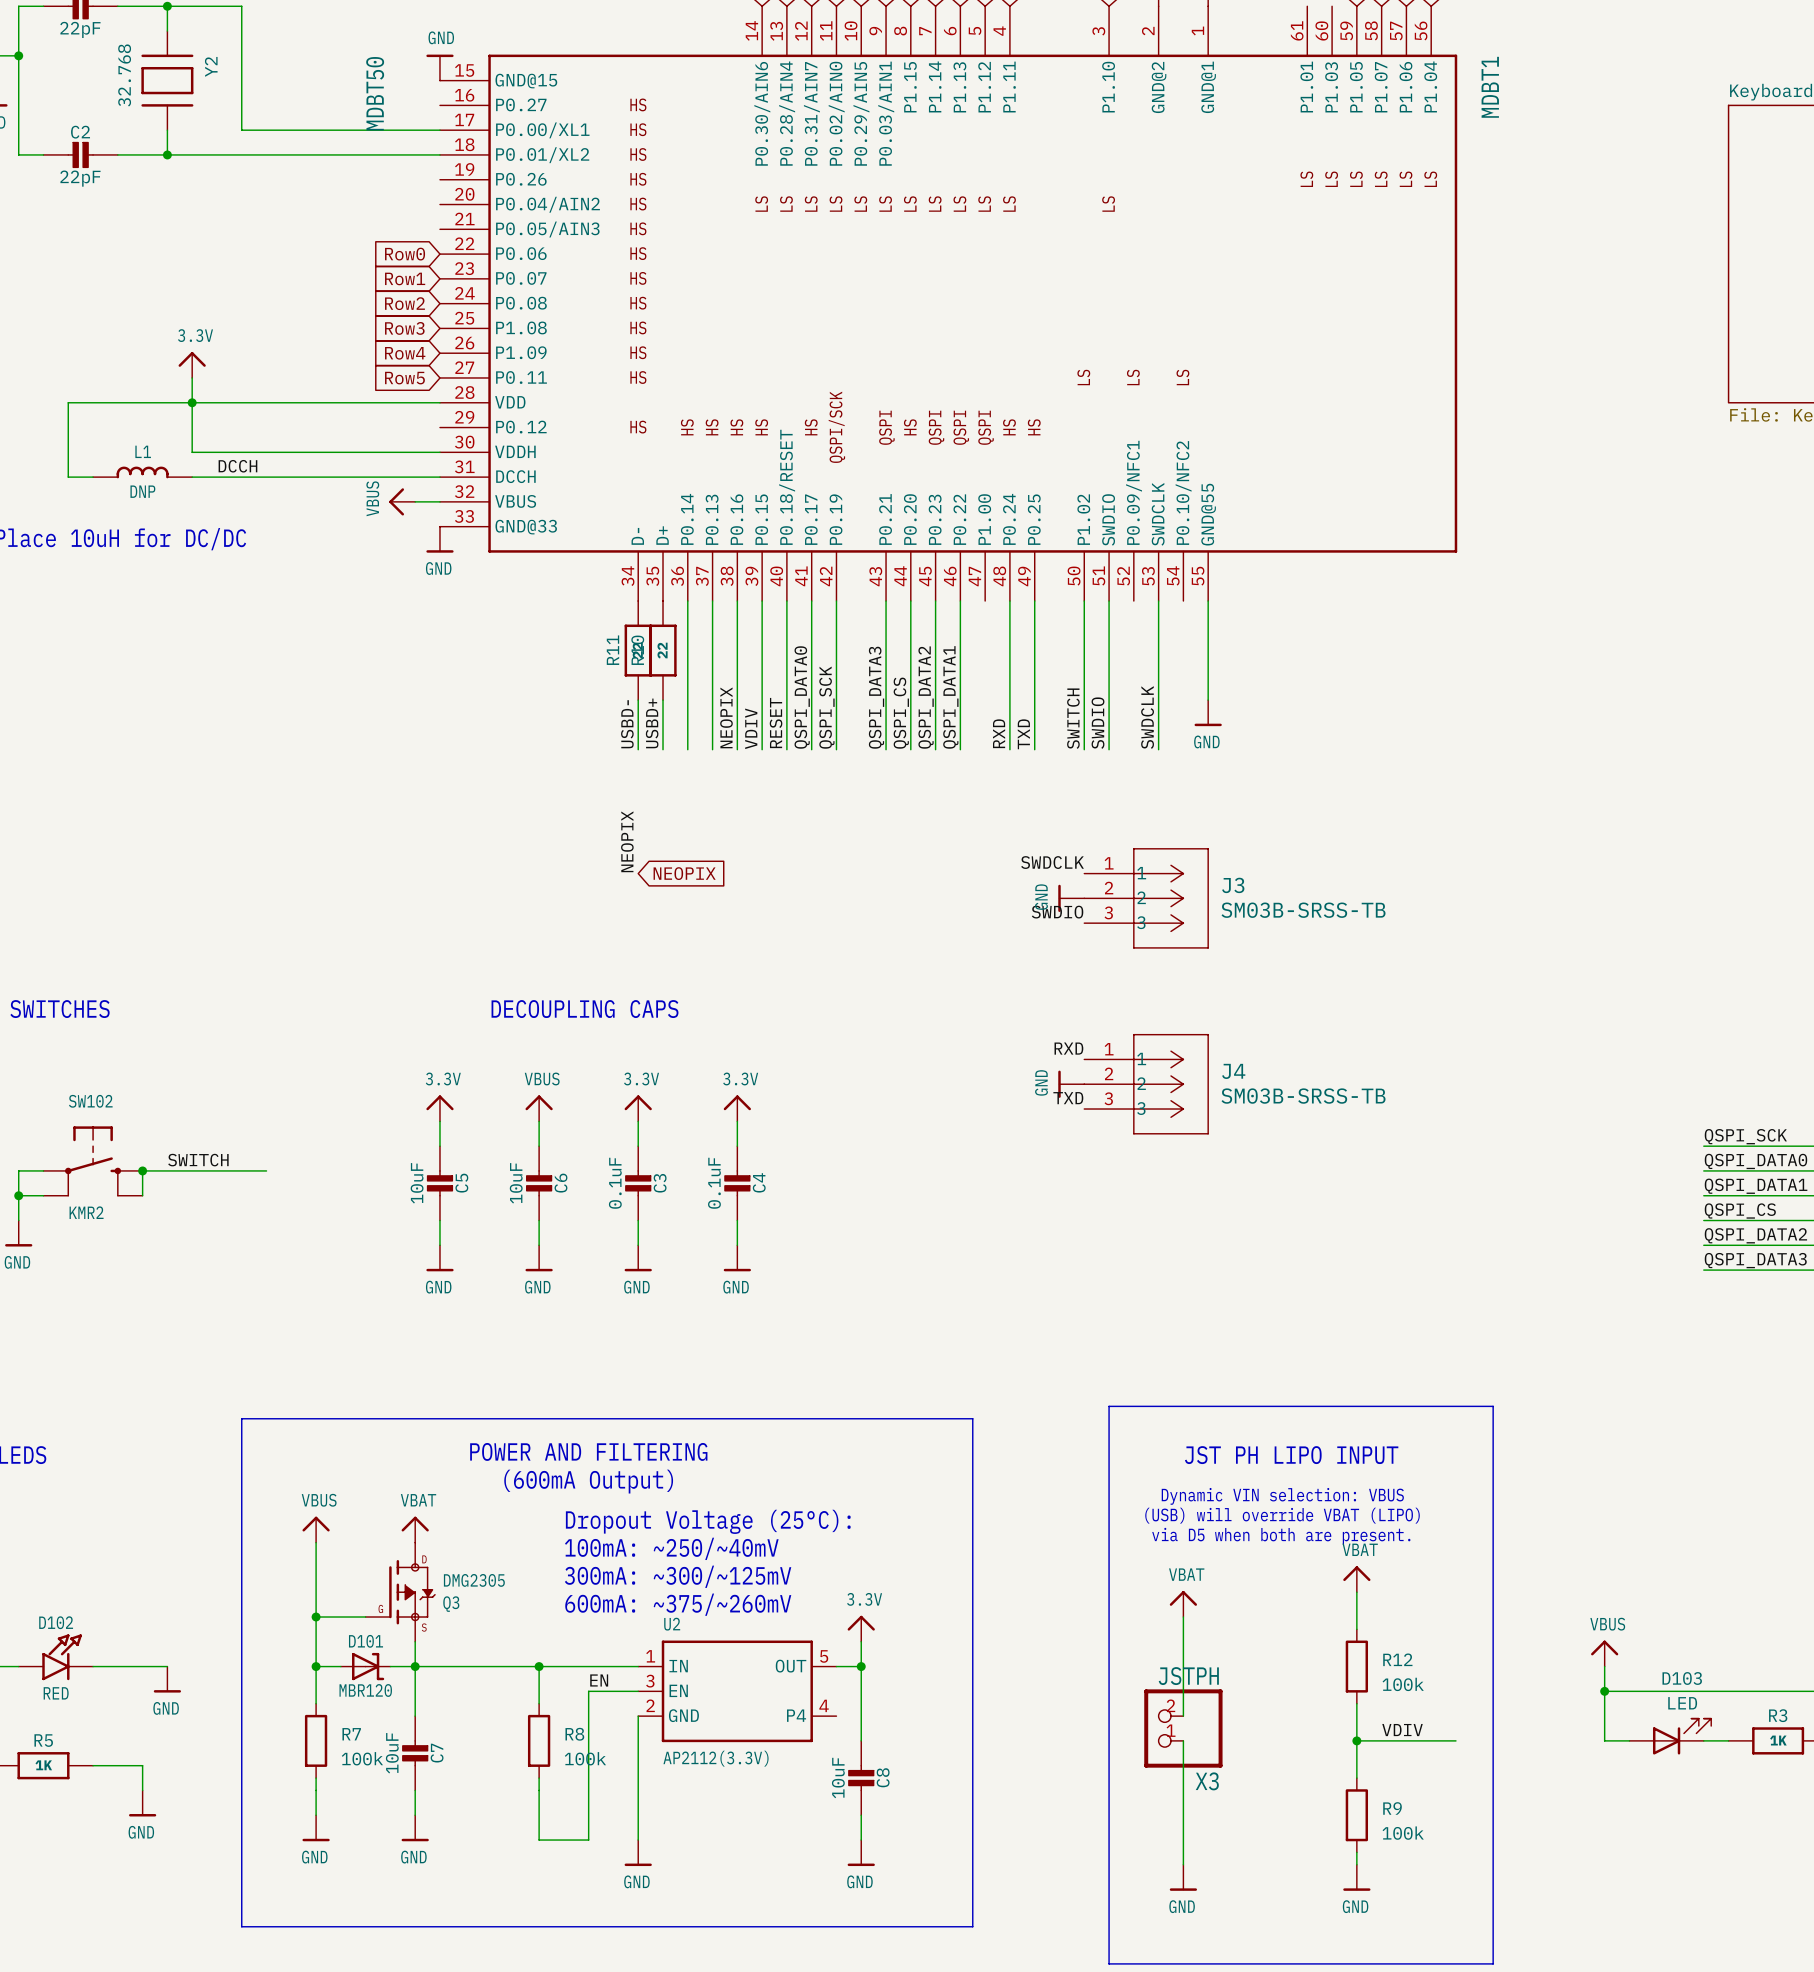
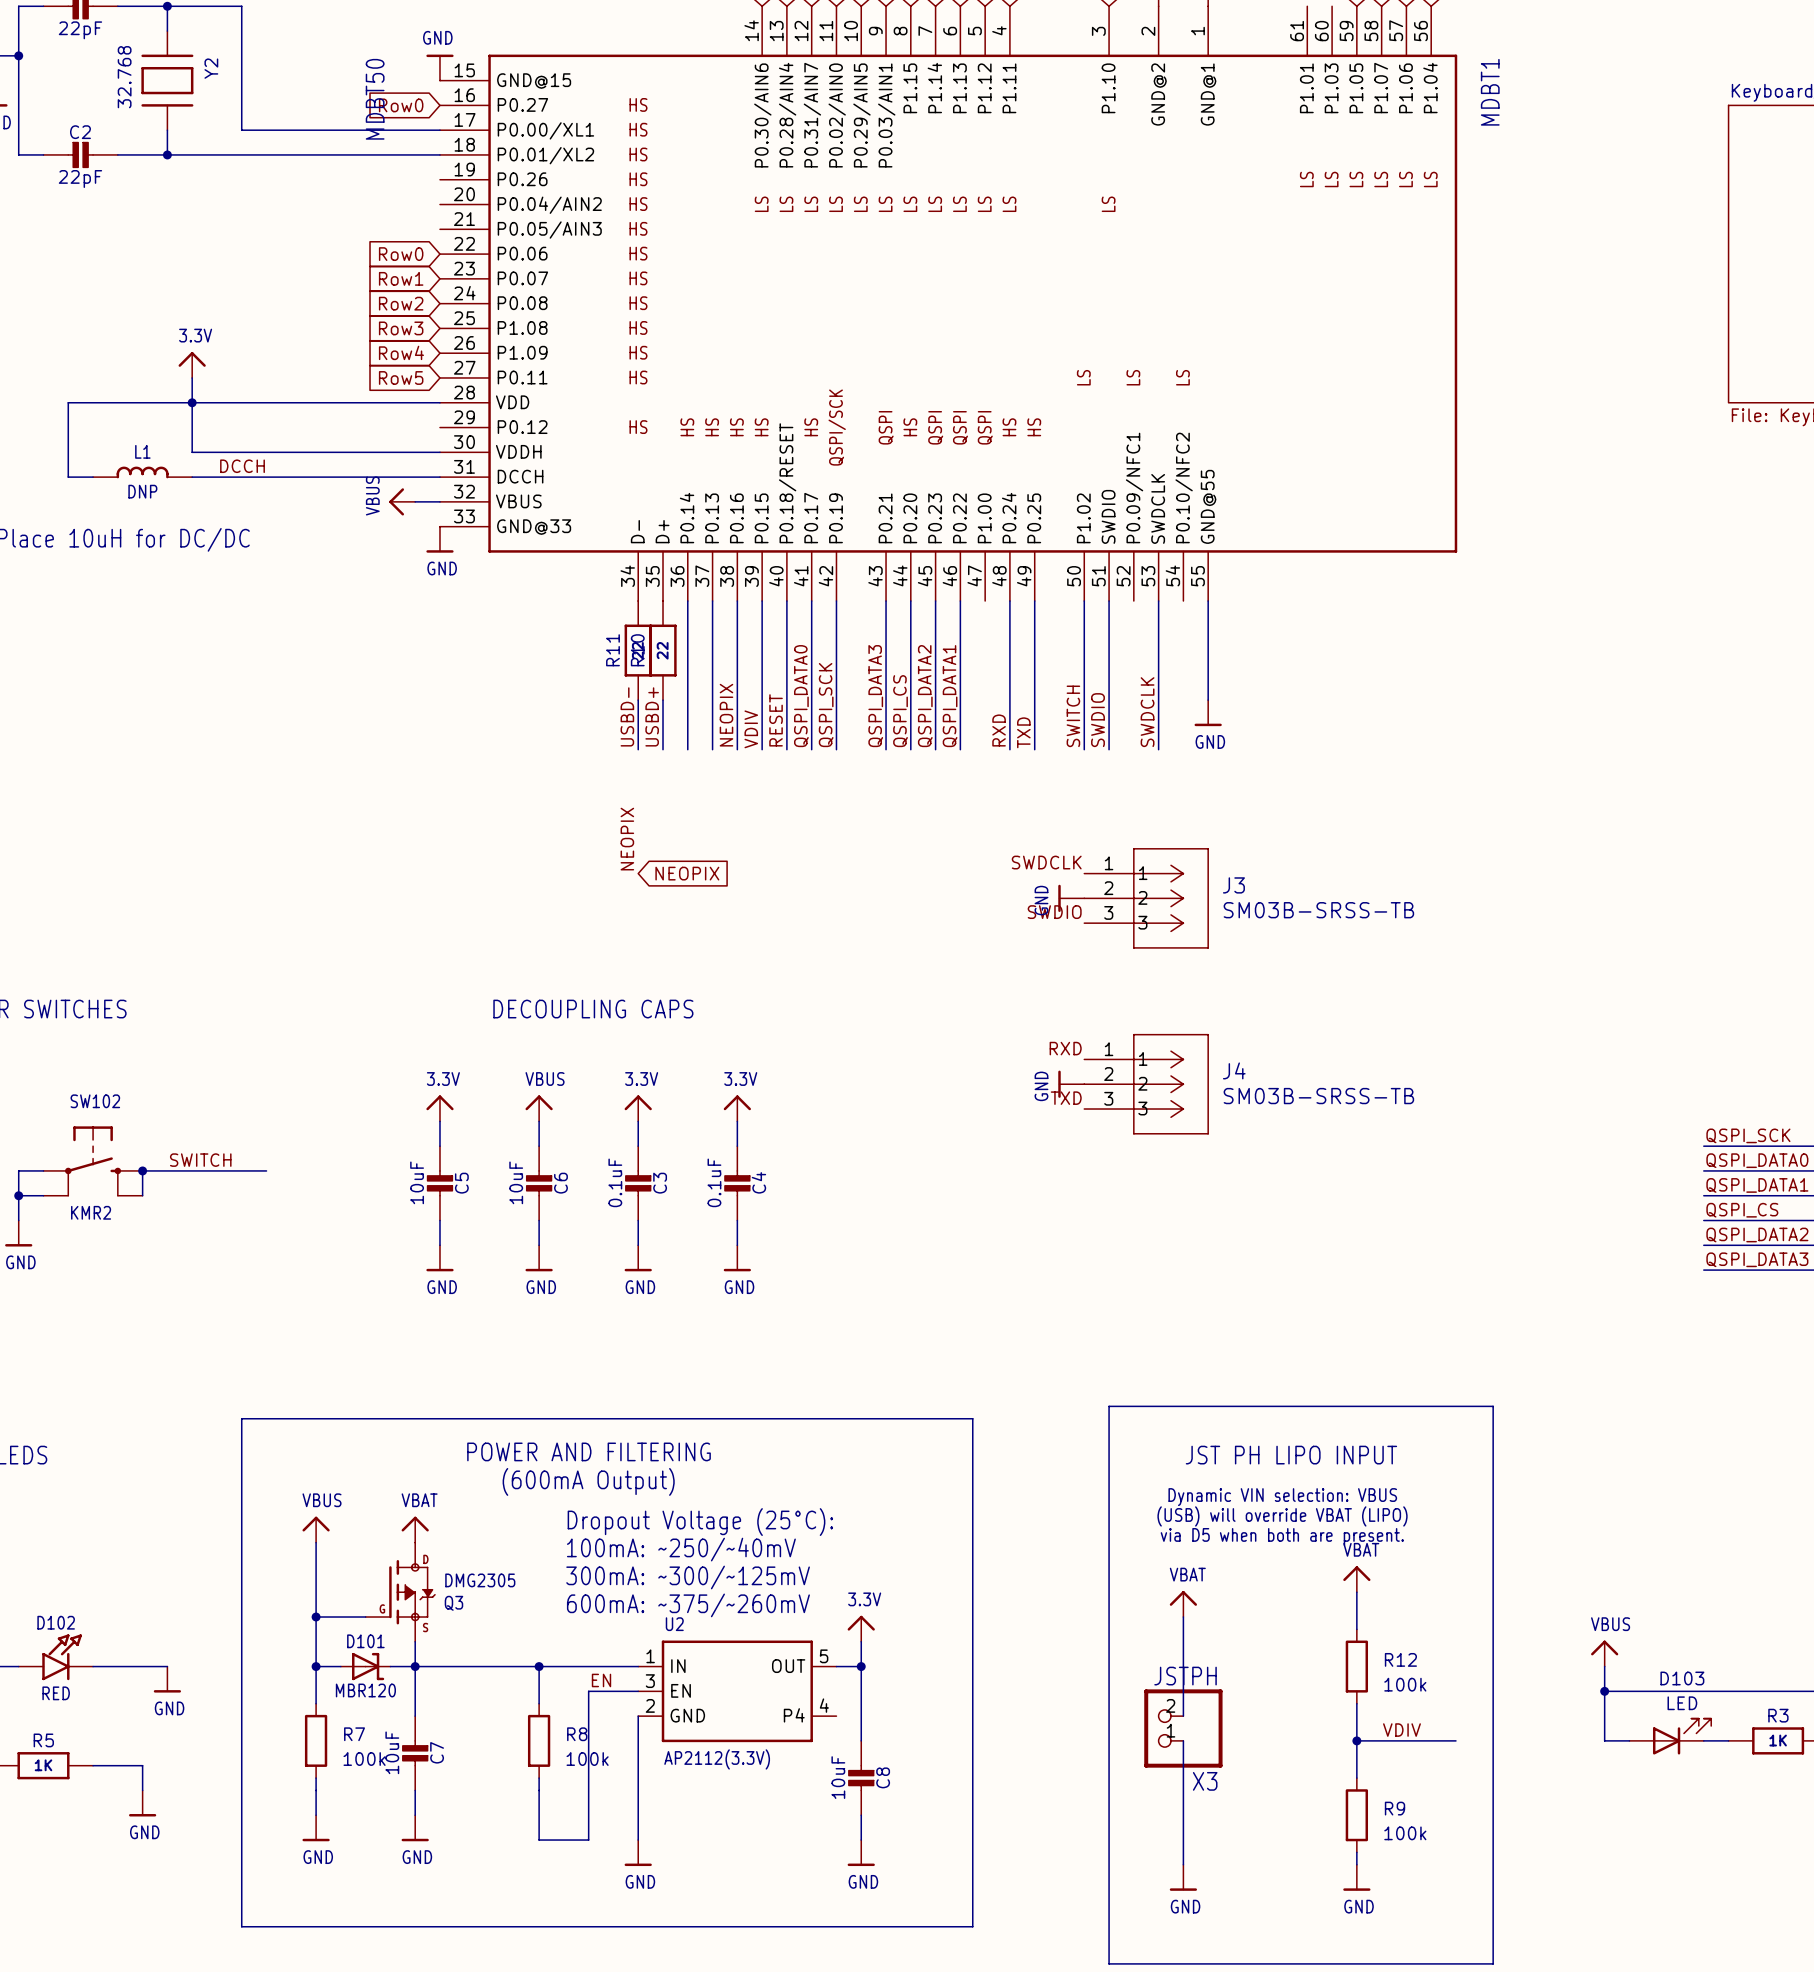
global label: none -> Row0 (401, 105)

